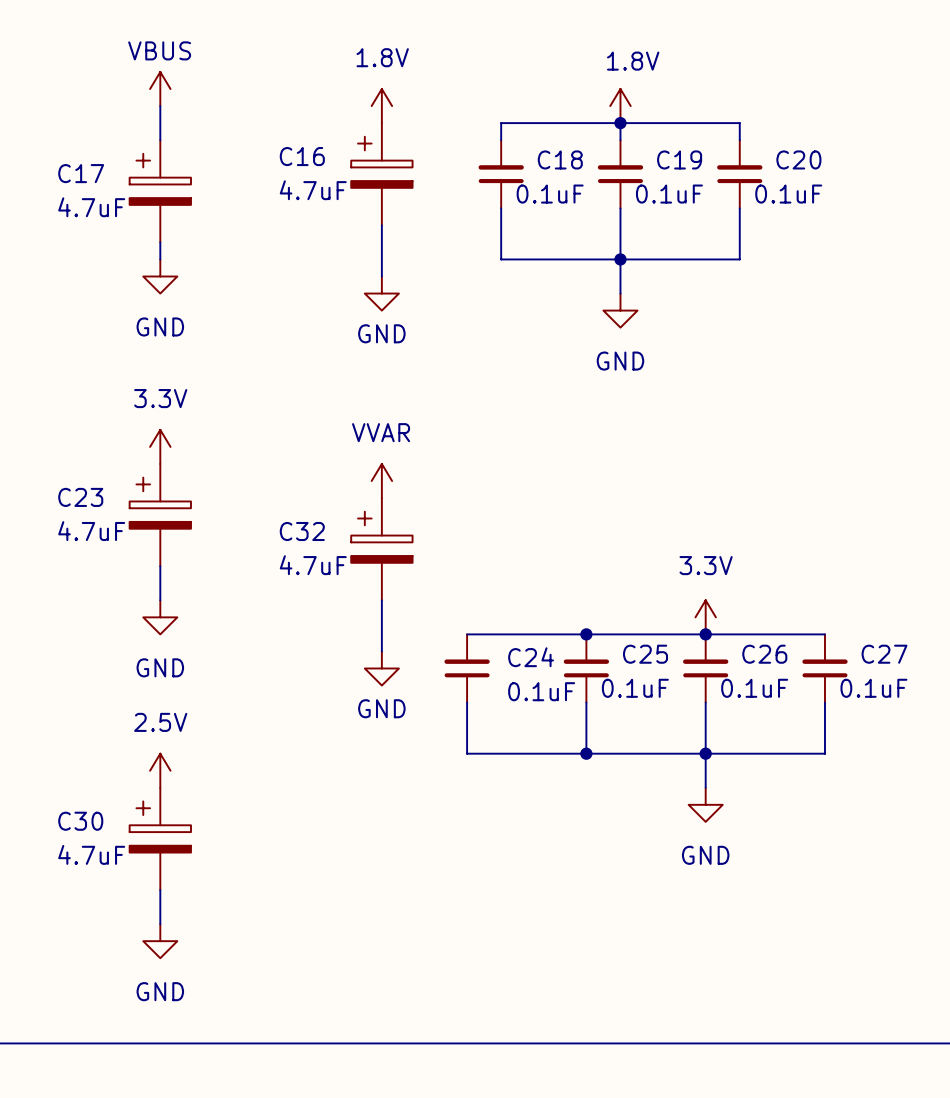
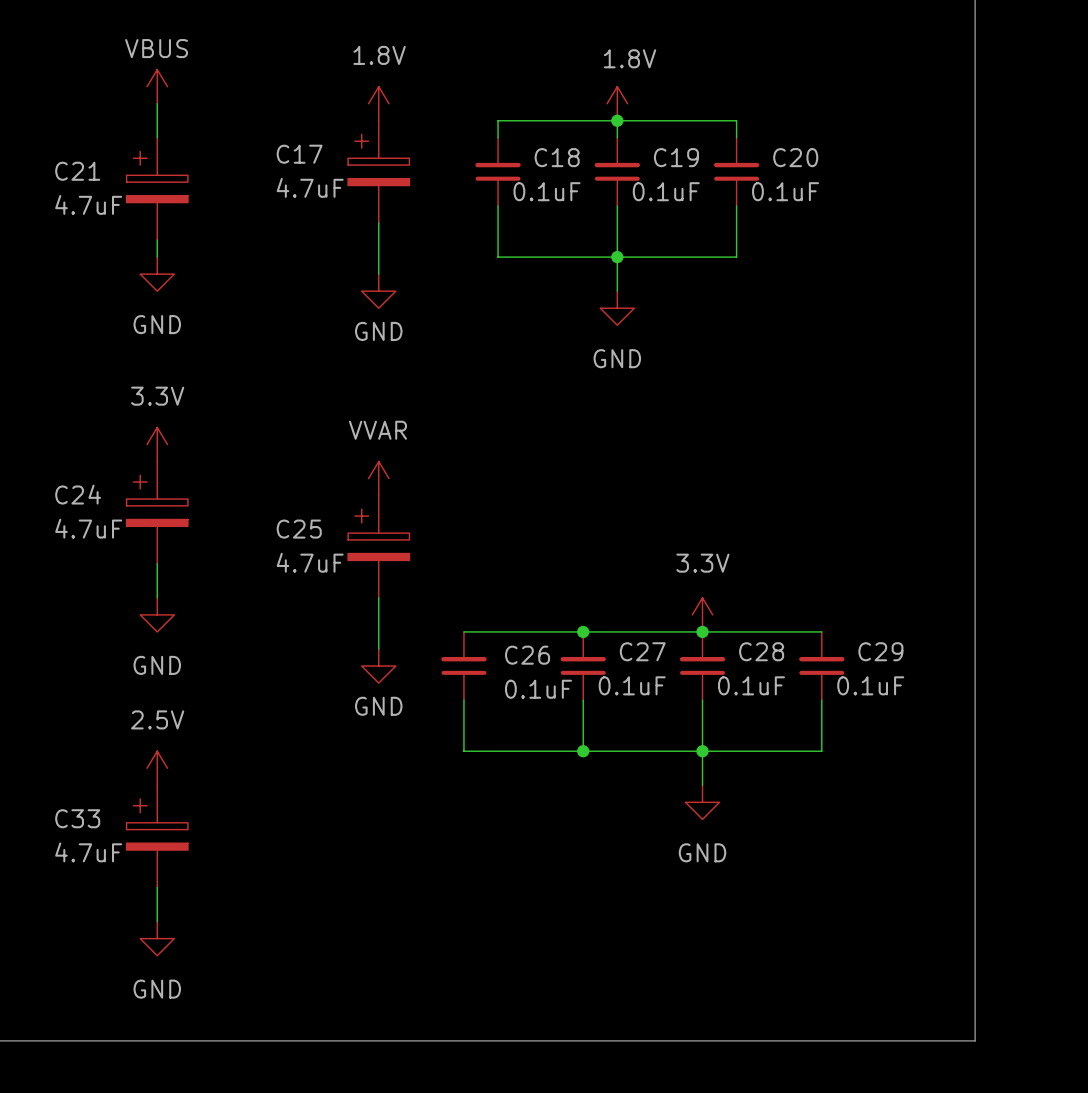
C16 name: C16 (302, 156) -> C17 (299, 154)
C17 name: C17 (81, 173) -> C21 (77, 171)
C23 name: C23 (80, 497) -> C24 (78, 494)
C32 name: C32 (302, 531) -> C25 (299, 529)
C25 name: C25 (645, 654) -> C27 (642, 651)
C26 name: C26 (764, 654) -> C28 (761, 651)
C27 name: C27 (884, 654) -> C29 (880, 651)
C24 name: C24 (531, 657) -> C26 (527, 655)
C30 name: C30 (80, 821) -> C33 (77, 818)

